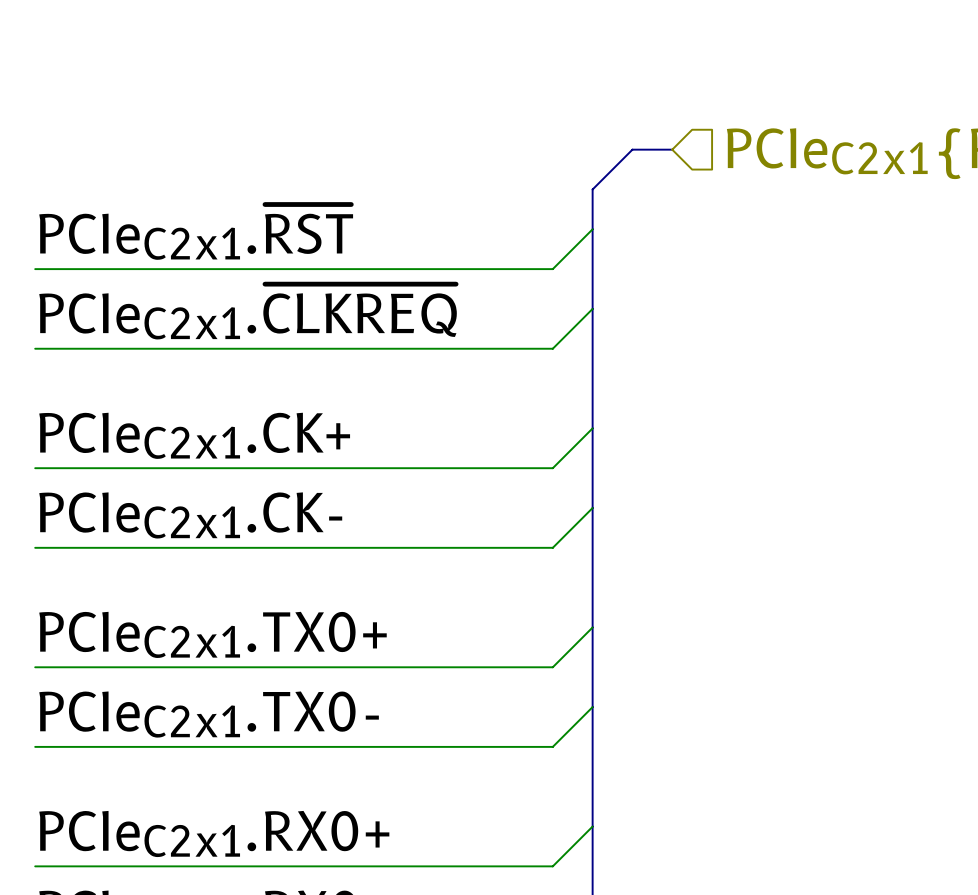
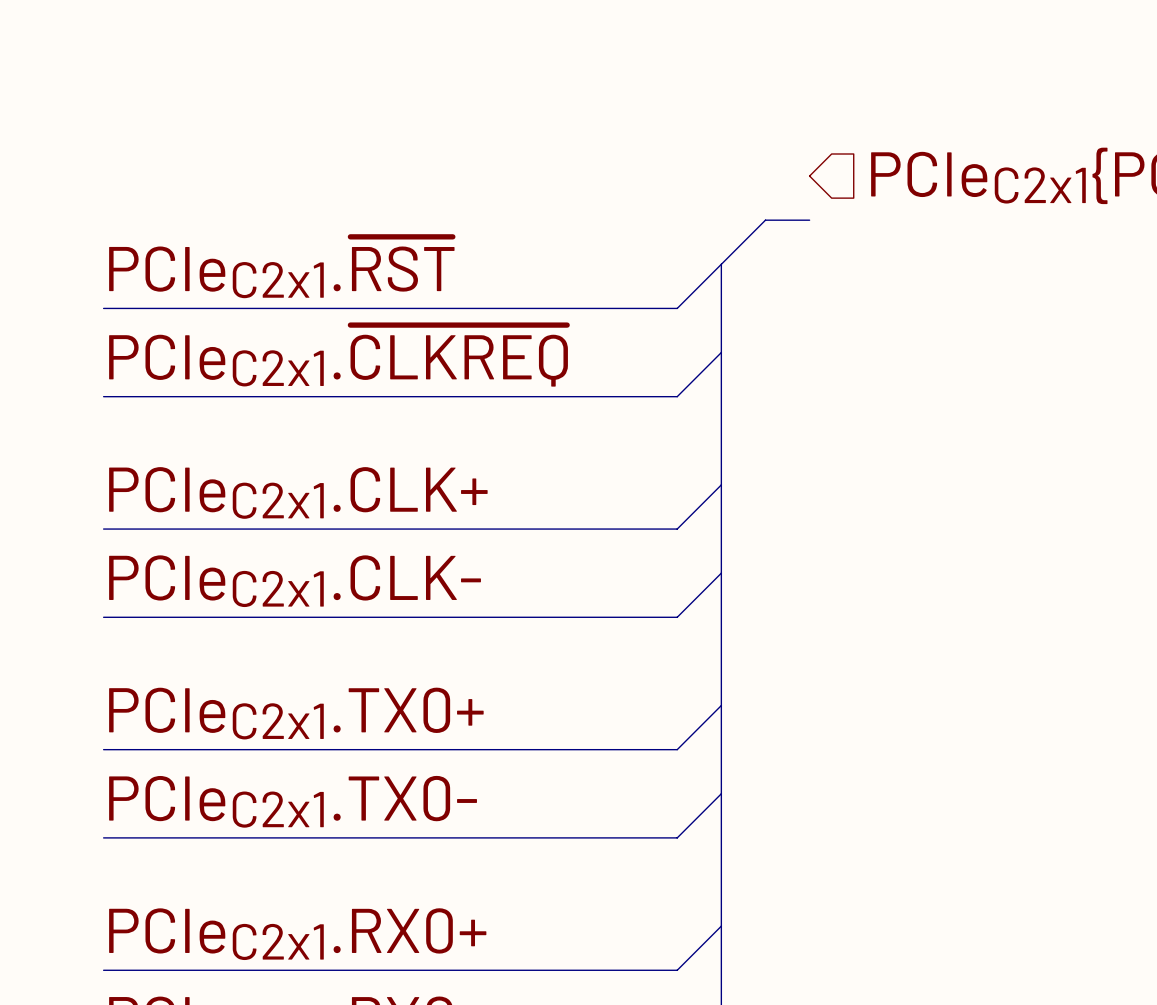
bus: (672, 149) (632, 149) (592, 189) (592, 229) -> (809, 220) (765, 220) (721, 264)
label: PCIeC2x1.CK+ (194, 435) -> PCIeC2x1.CLK+ (298, 492)
label: PCIeC2x1.CK- (190, 515) -> PCIeC2x1.CLK- (295, 581)

